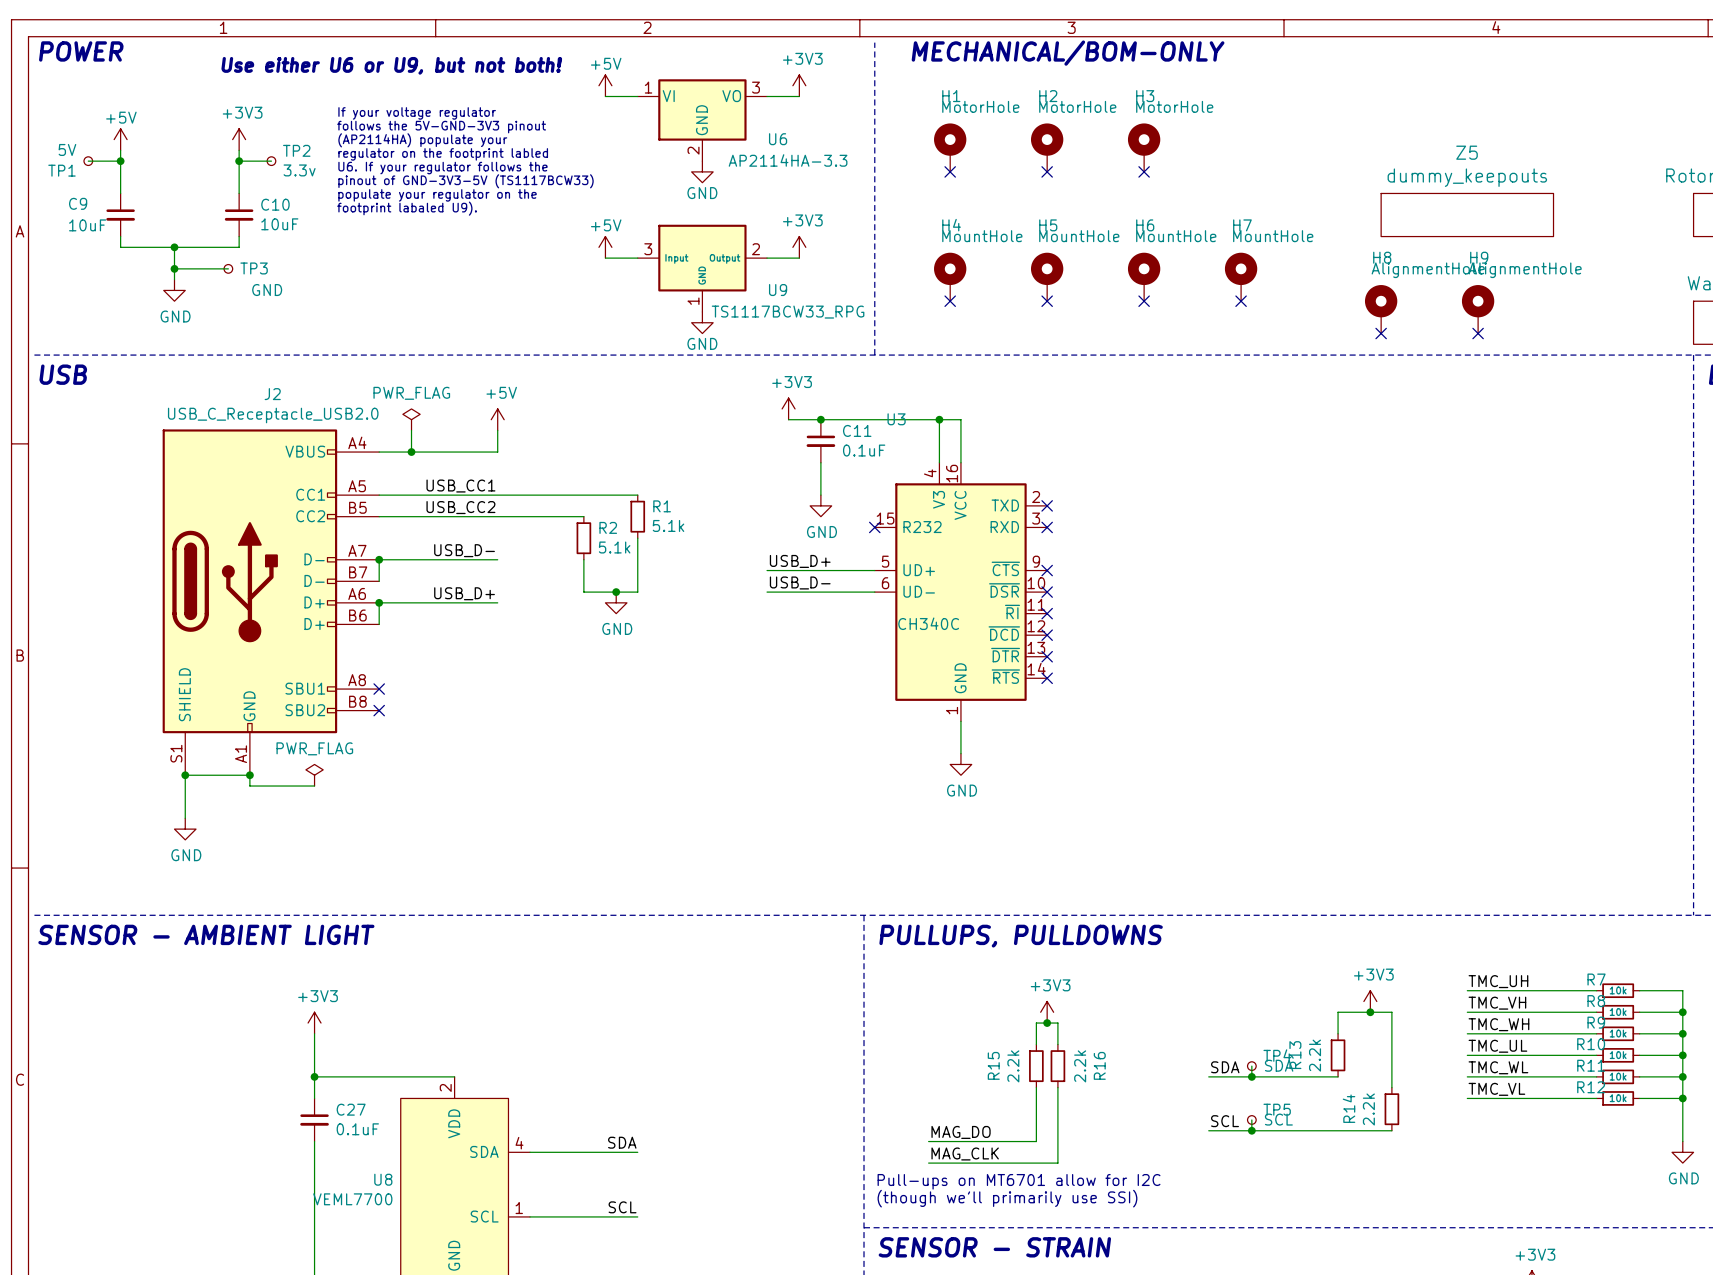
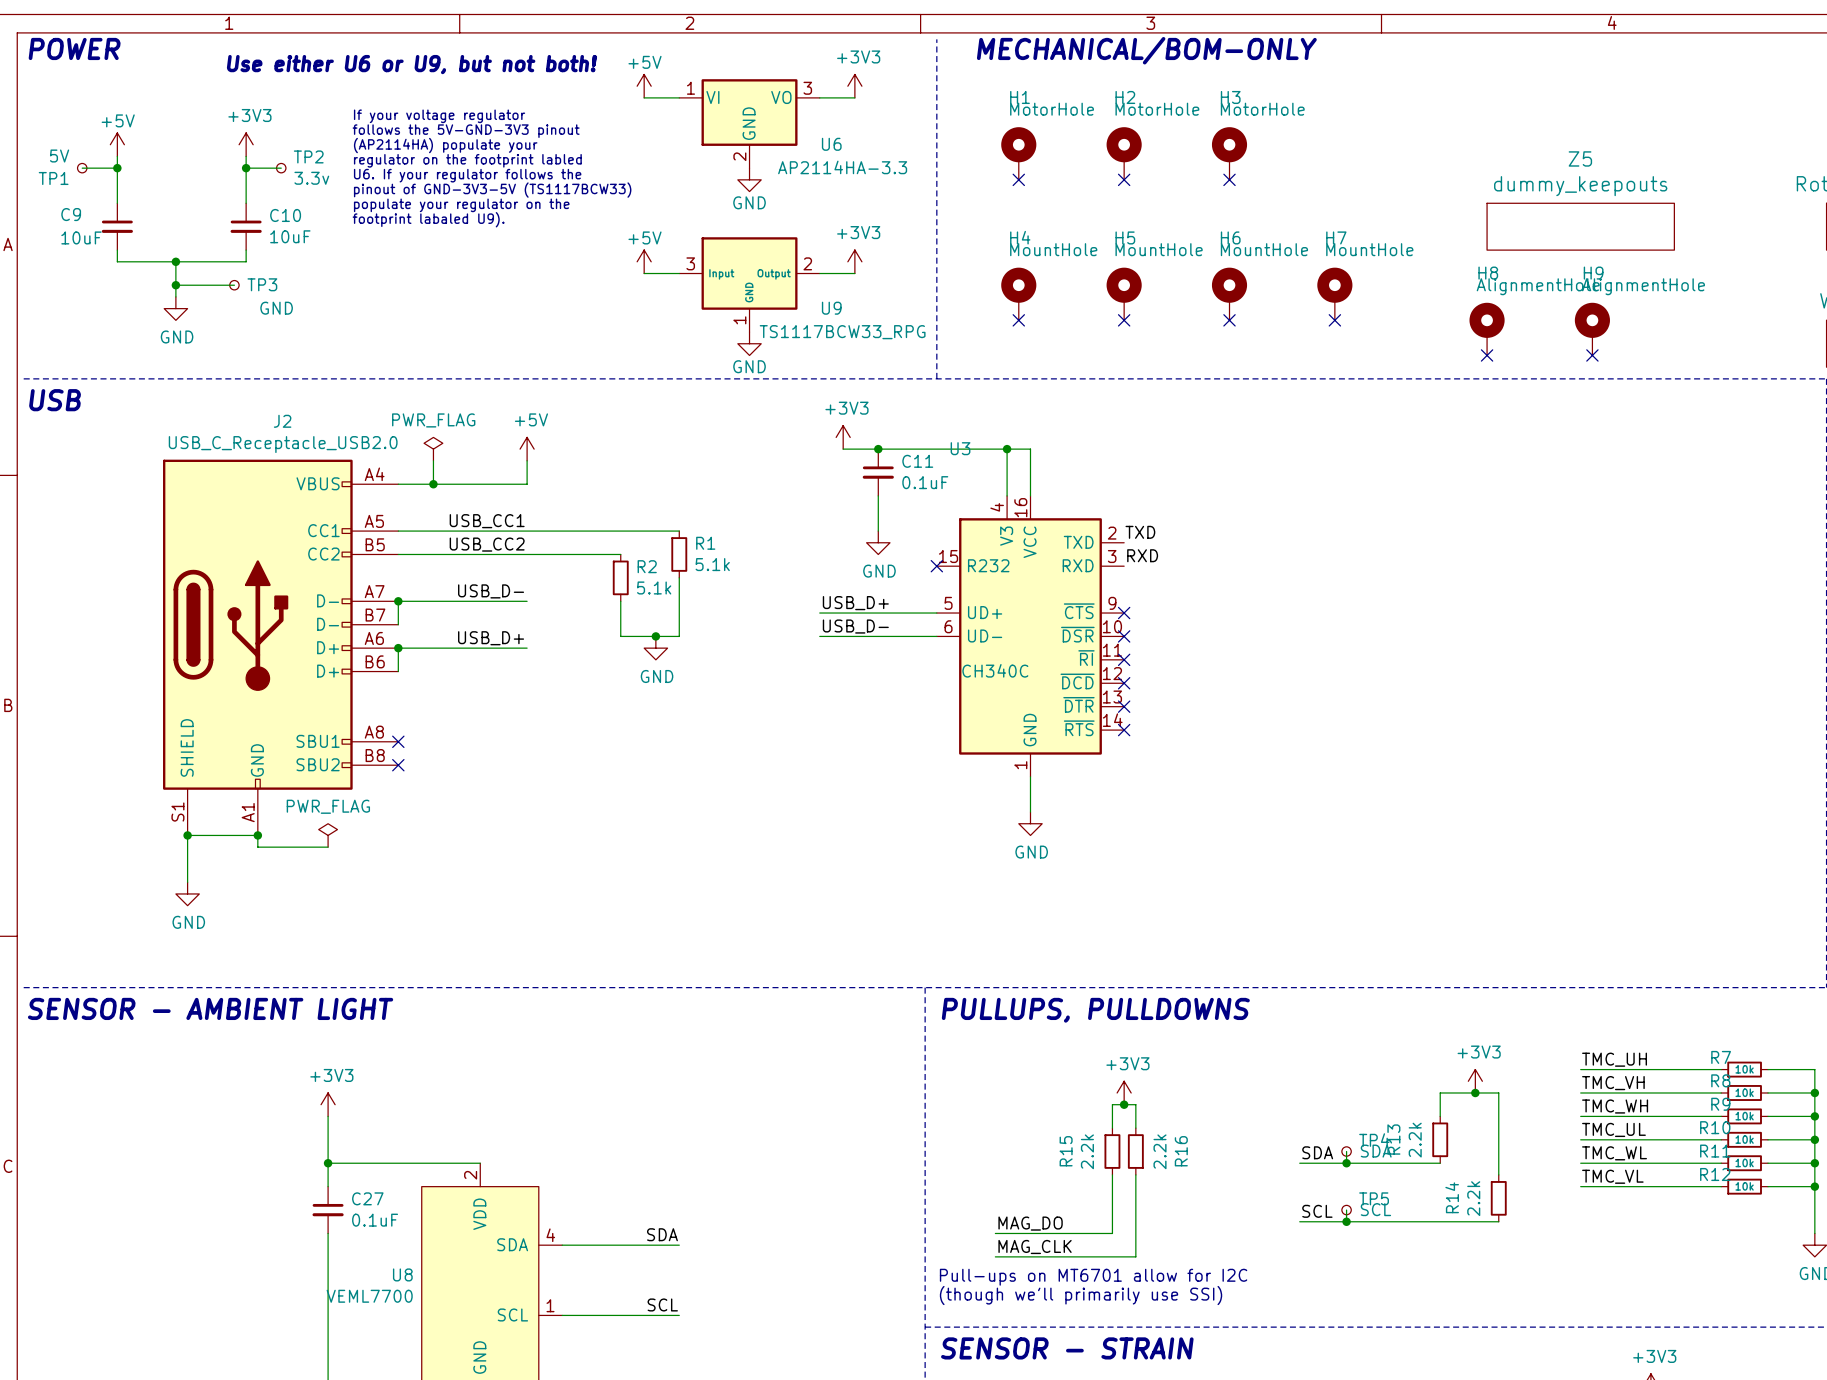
label: none -> TXD (1140, 532)
no-connect mark: (1047, 505) -> none
label: none -> RXD (1142, 555)
no-connect mark: (1047, 527) -> none

